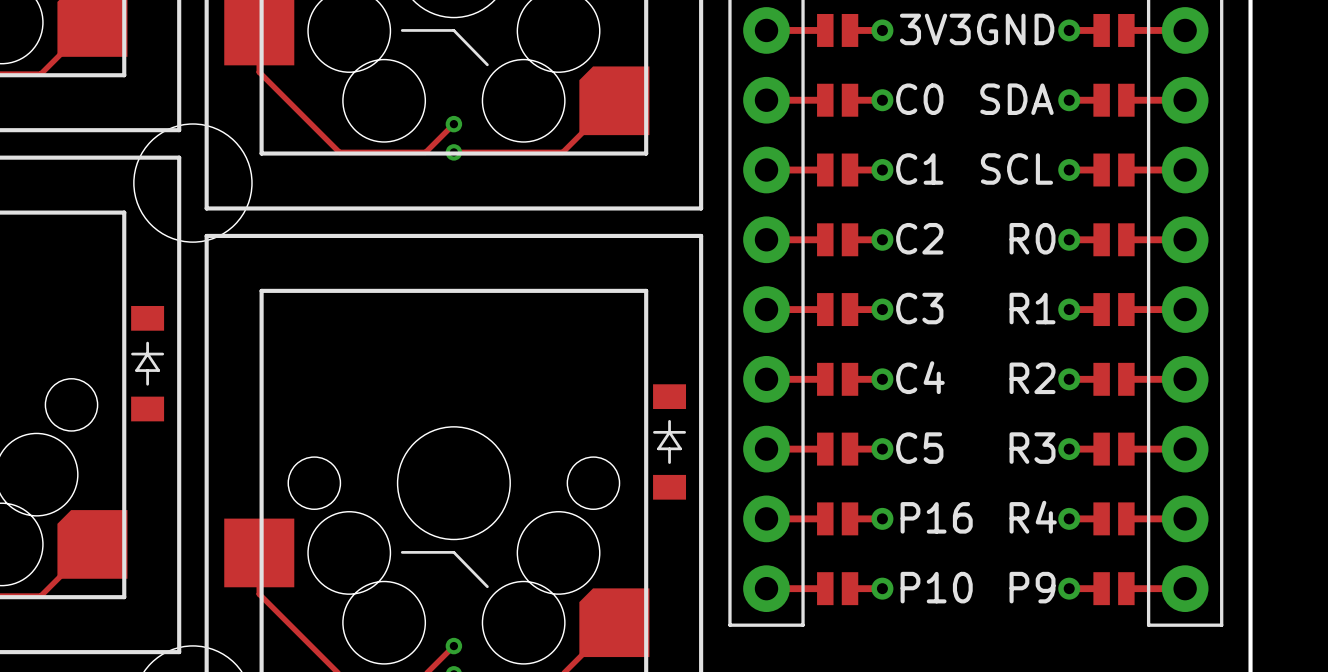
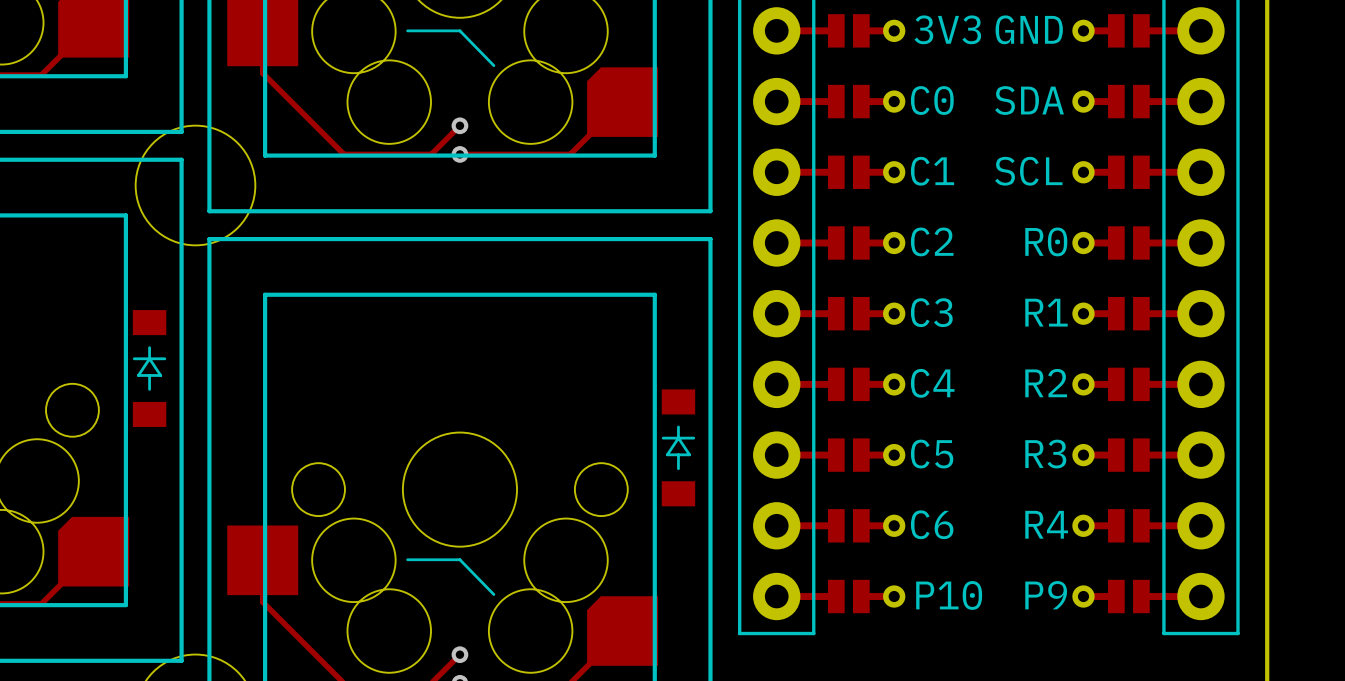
part text: none -> C6 (932, 524)
part text: P16 (936, 517) -> none

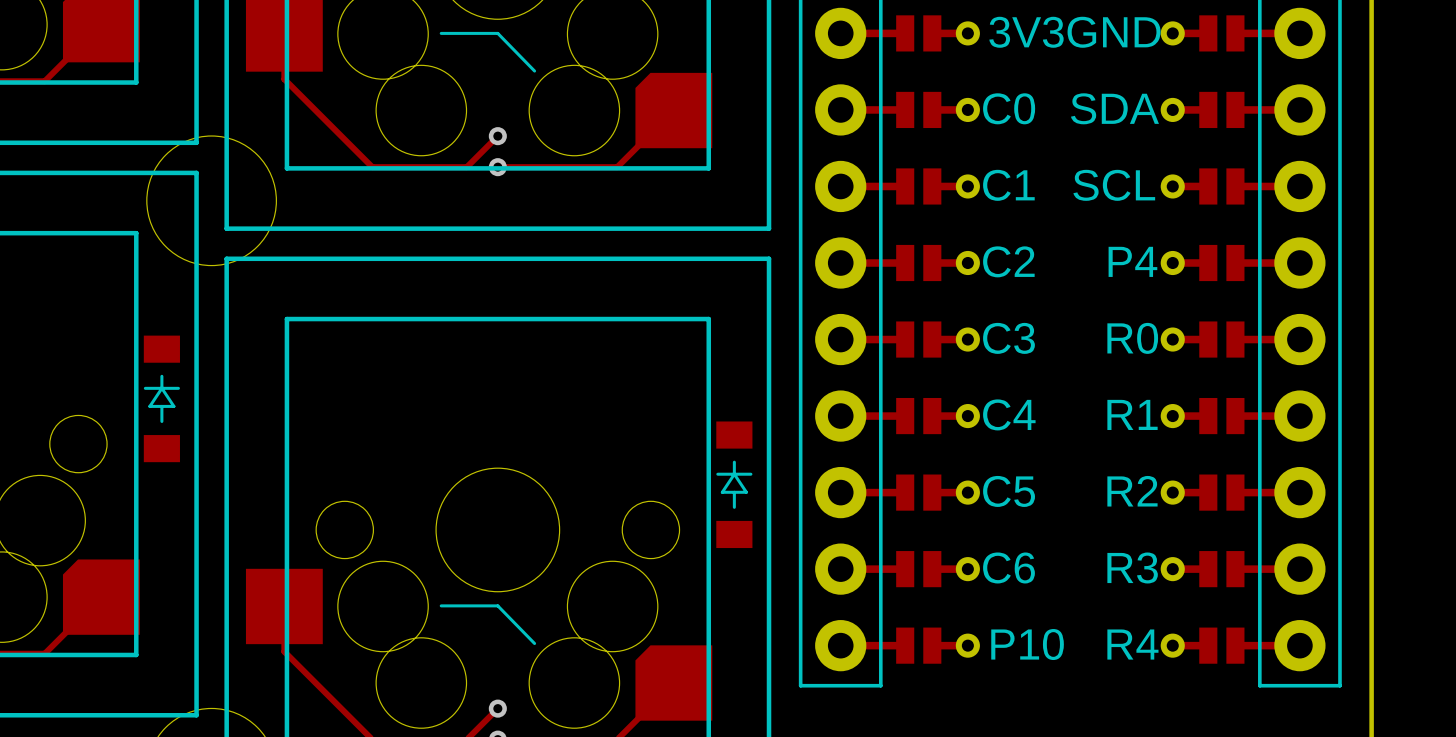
part text: R0 (1046, 241) -> P4 (1132, 261)
part text: R1 (1046, 312) -> R0 (1132, 338)
part text: R2 (1046, 383) -> R1 (1132, 414)
part text: R3 (1045, 454) -> R2 (1132, 491)
part text: R4 (1046, 524) -> R3 (1132, 567)
part text: P9 (1046, 595) -> R4 (1132, 644)

